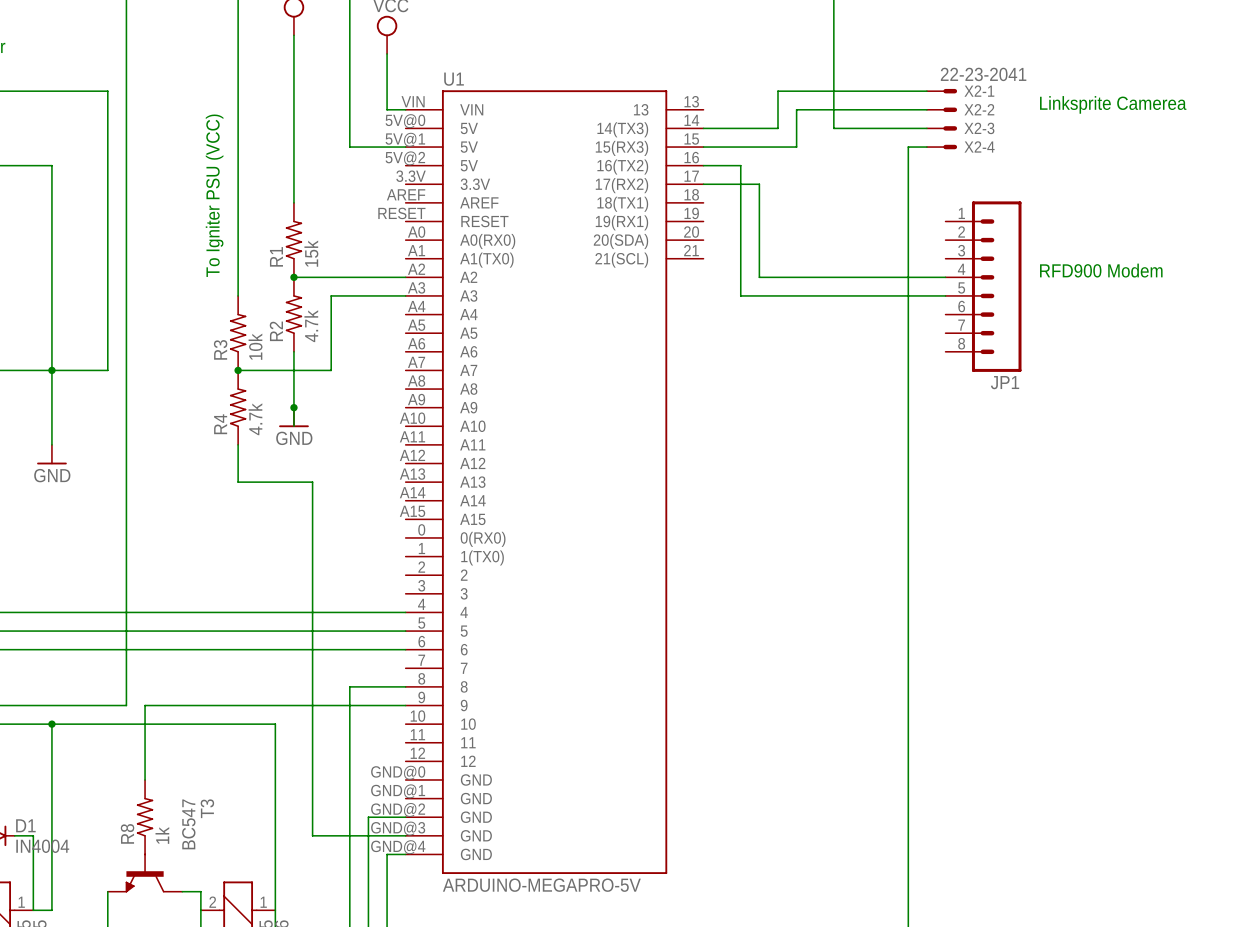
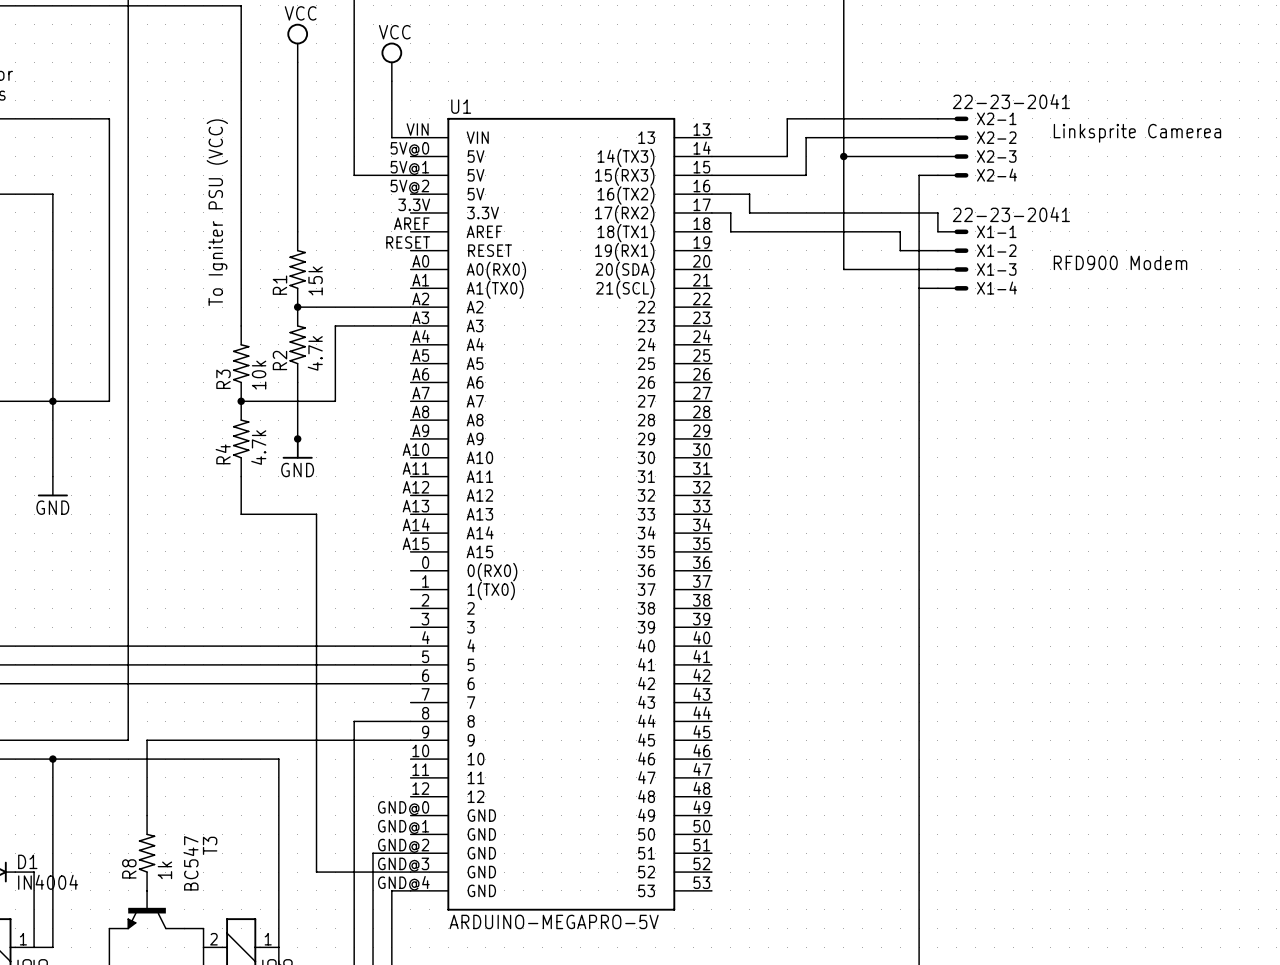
U1 symbol: [405, 90, 704, 875] -> [410, 117, 712, 911]
wire: none -> (843, 156) (843, 269) (937, 269)
junction: none -> (843, 156)
wire: (722, 184) (740, 184) (740, 295) (945, 295) -> (730, 212) (730, 231) (900, 231) (900, 250) (937, 250)
wire: (759, 184) (759, 277) (945, 277) -> (768, 212) (937, 212) (937, 231)
X1-1: none -> 22-23-2041 (953, 231)
X1-2: none -> (953, 250)
X1-3: none -> (953, 269)
wire: none -> (919, 288) (937, 288)
X1-4: none -> (953, 288)
text position: RFD900 Modem (1101, 270) -> RFD900 Modem (1120, 262)
JP1: (983, 286) -> none

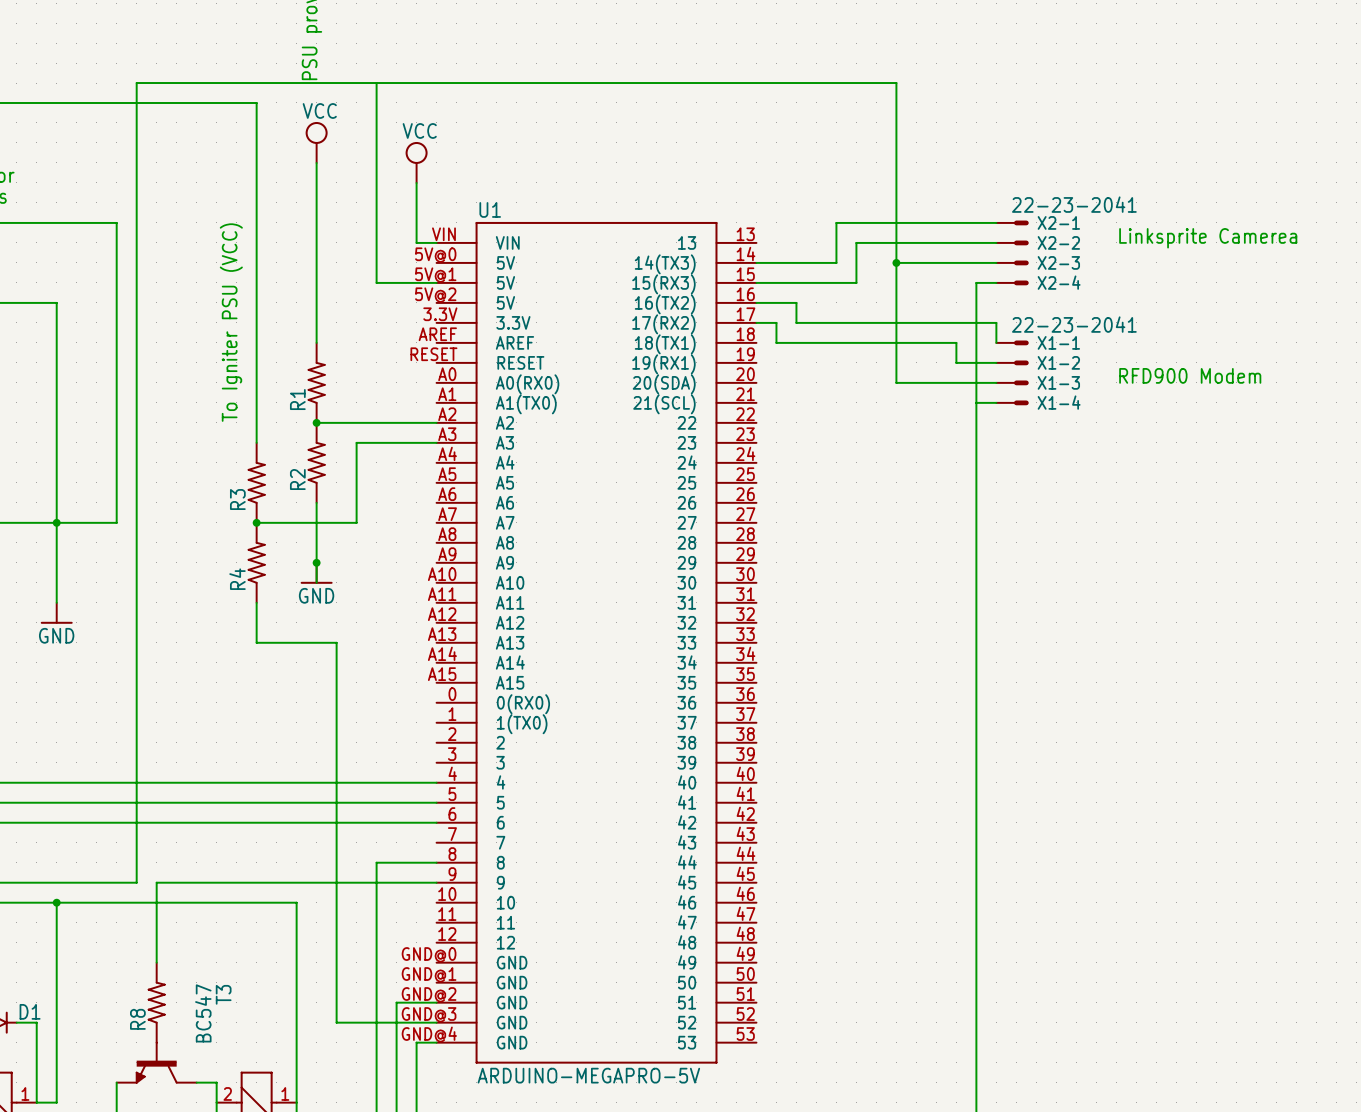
R1 value: 15k (315, 280) -> none
R2 value: 4.7k (315, 353) -> none
R3 value: 10k (259, 375) -> none
R4 value: 4.7k (258, 447) -> none
R8 value: 1k (164, 870) -> none
D1 value: IN4004 (48, 882) -> none

